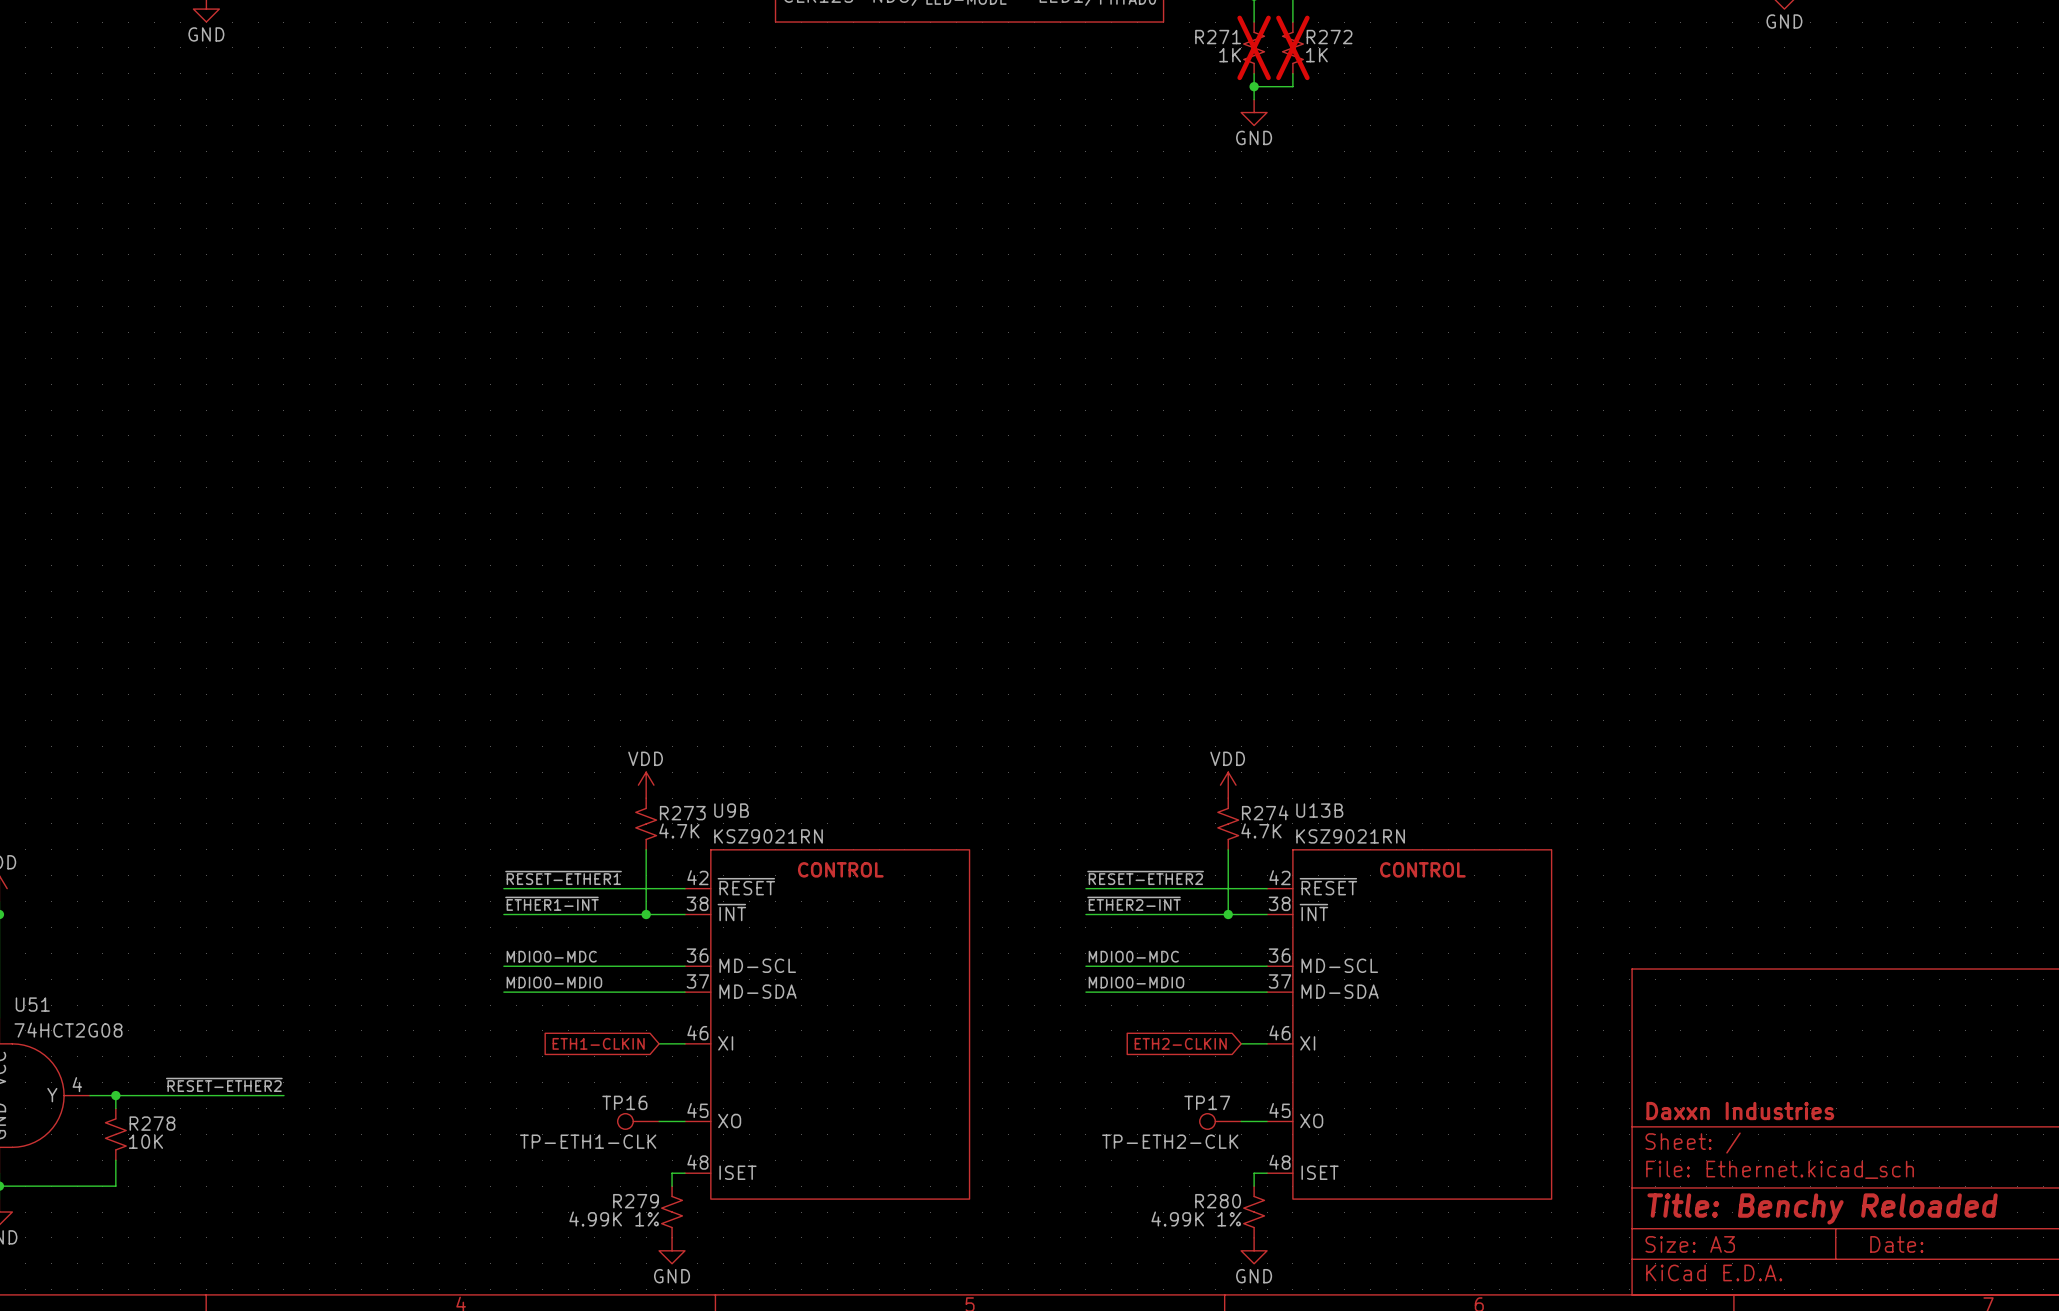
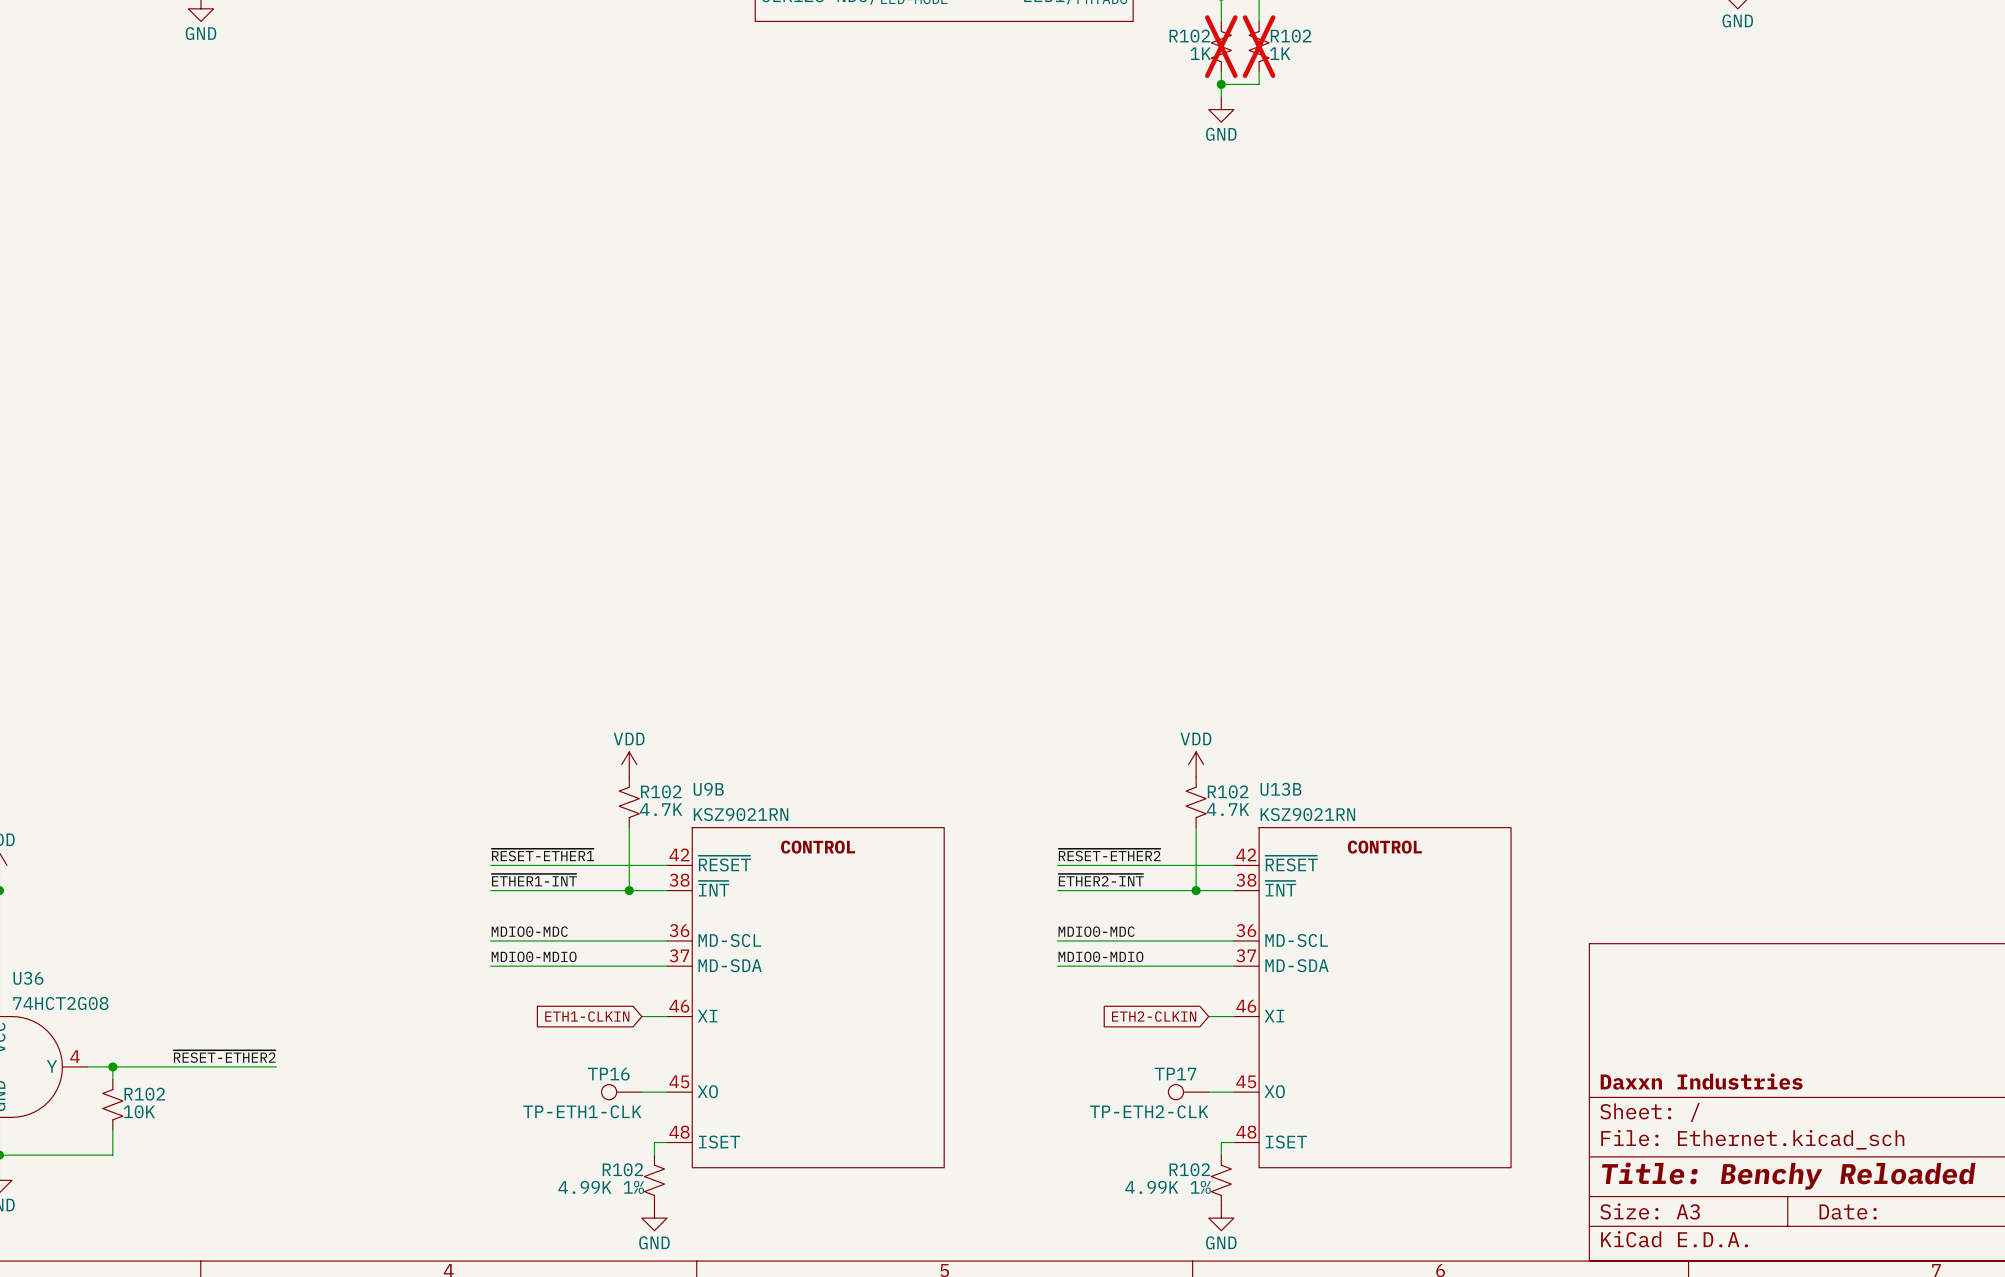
R271 name: R271 (1218, 37) -> R102 (1189, 36)
R272 name: R272 (1329, 37) -> R102 (1291, 36)
R274 name: R274 (1265, 812) -> R102 (1228, 791)
R273 name: R273 (682, 813) -> R102 (661, 791)
U51 name: U51 (32, 1004) -> U36 (28, 978)
R278 name: R278 (152, 1123) -> R102 (144, 1094)
R279 name: R279 (636, 1201) -> R102 (622, 1169)
R280 name: R280 (1218, 1201) -> R102 (1189, 1169)

